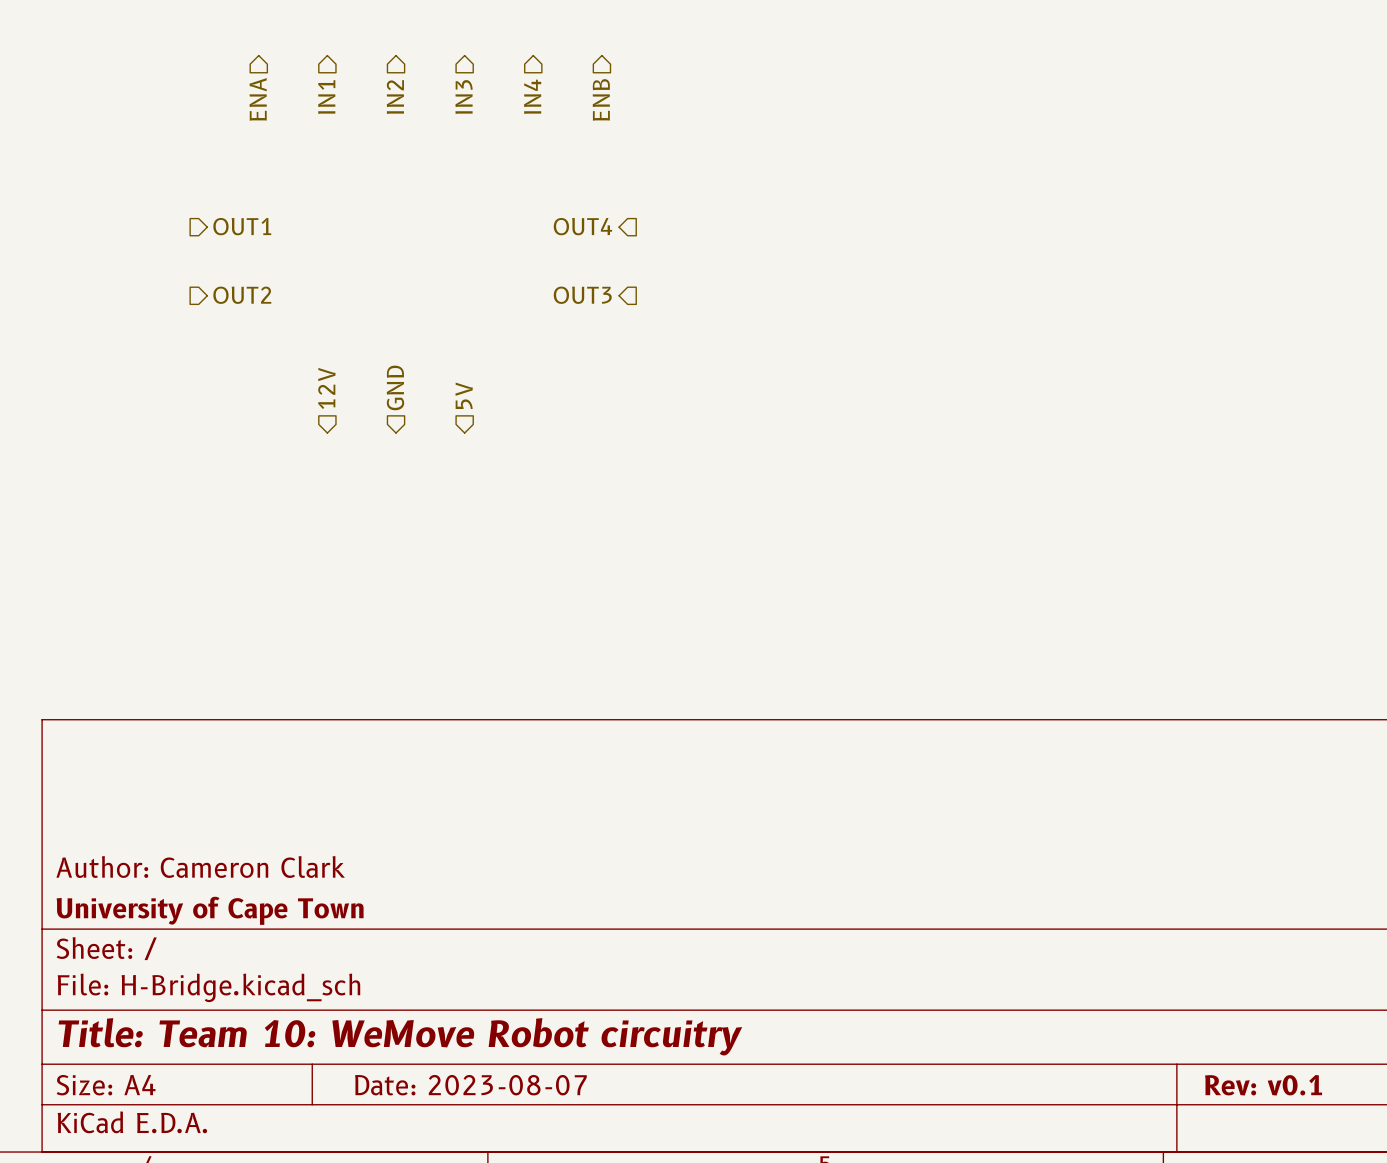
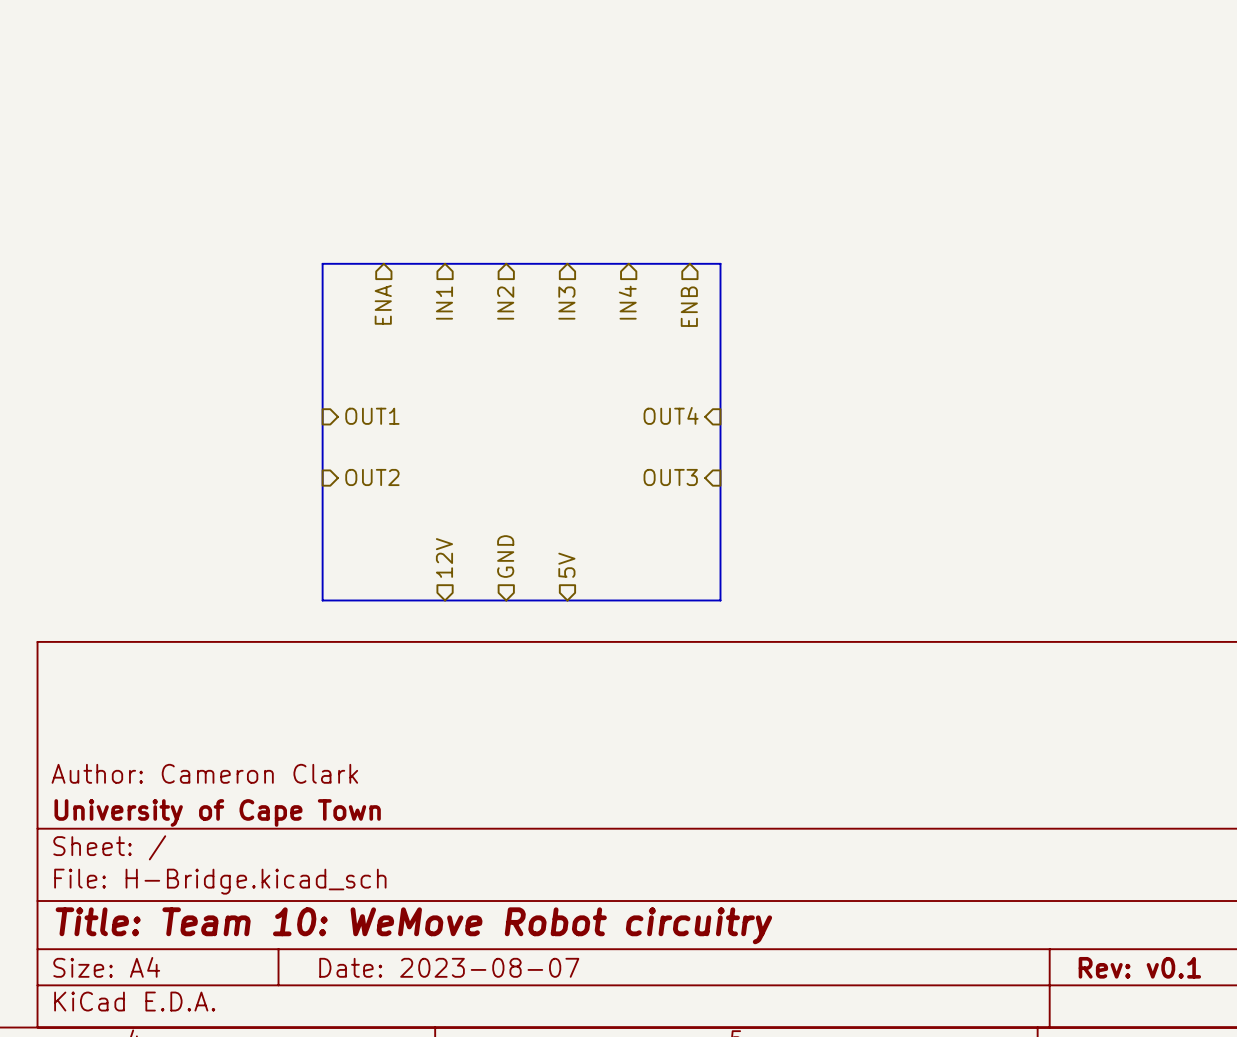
hierarchical label position: IN4 (532, 96) -> IN4 (627, 302)
hierarchical label position: IN1 (326, 97) -> IN1 (444, 303)
hierarchical label position: IN2 (395, 97) -> IN2 (505, 303)
hierarchical label position: IN3 (464, 97) -> IN3 (566, 303)
hierarchical label position: ENA (258, 99) -> ENA (383, 304)
hierarchical label position: ENB (601, 99) -> ENB (689, 306)
hierarchical label position: OUT1 (242, 226) -> OUT1 (372, 416)
hierarchical label position: OUT4 (582, 226) -> OUT4 (671, 415)
hierarchical label position: OUT2 (242, 295) -> OUT2 (372, 477)
line: none -> (322, 263) (720, 263) (720, 600) (322, 600) (322, 263)
hierarchical label position: OUT3 (582, 295) -> OUT3 (670, 477)
hierarchical label position: GND (395, 387) -> GND (505, 556)
hierarchical label position: 12V (326, 388) -> 12V (444, 557)
hierarchical label position: 5V (464, 395) -> 5V (566, 565)

